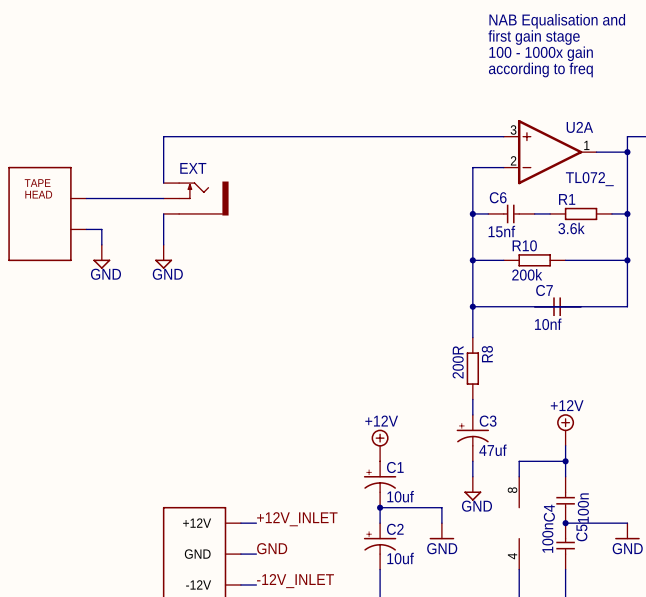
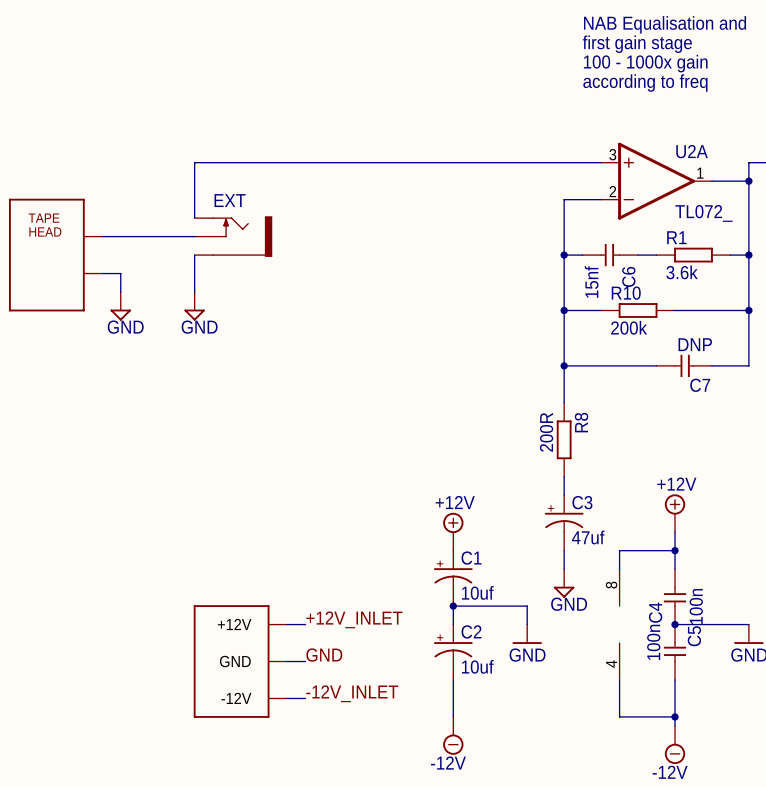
C6 name rotation: 0° (498, 197) -> 90° counterclockwise (628, 276)
C6 name position: C6 (498, 197) -> C6 (628, 276)
C6 value rotation: 0° (501, 231) -> 90° counterclockwise (591, 281)
C7 rotation: 0° (557, 306) -> 180° (684, 365)
C7 value: 10nf (548, 324) -> DNP (695, 344)

